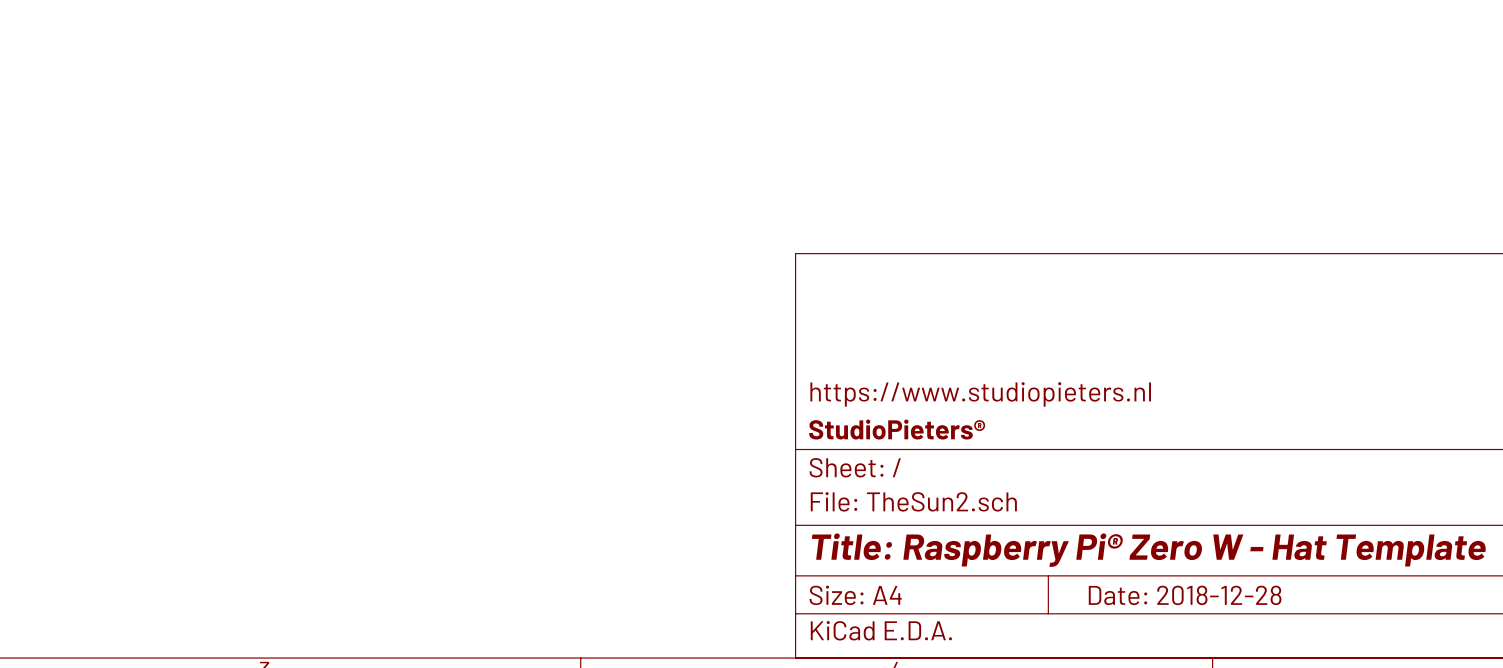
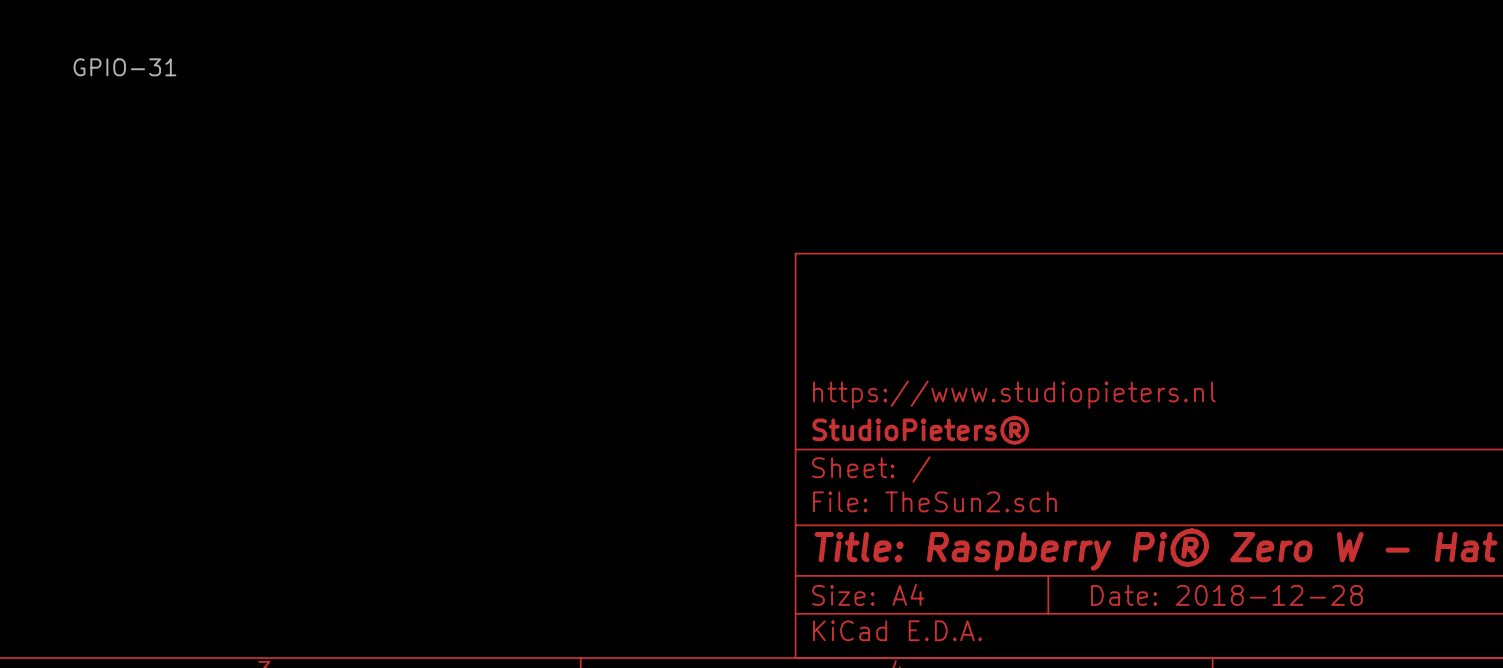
label: none -> GPIO-31 (124, 67)

